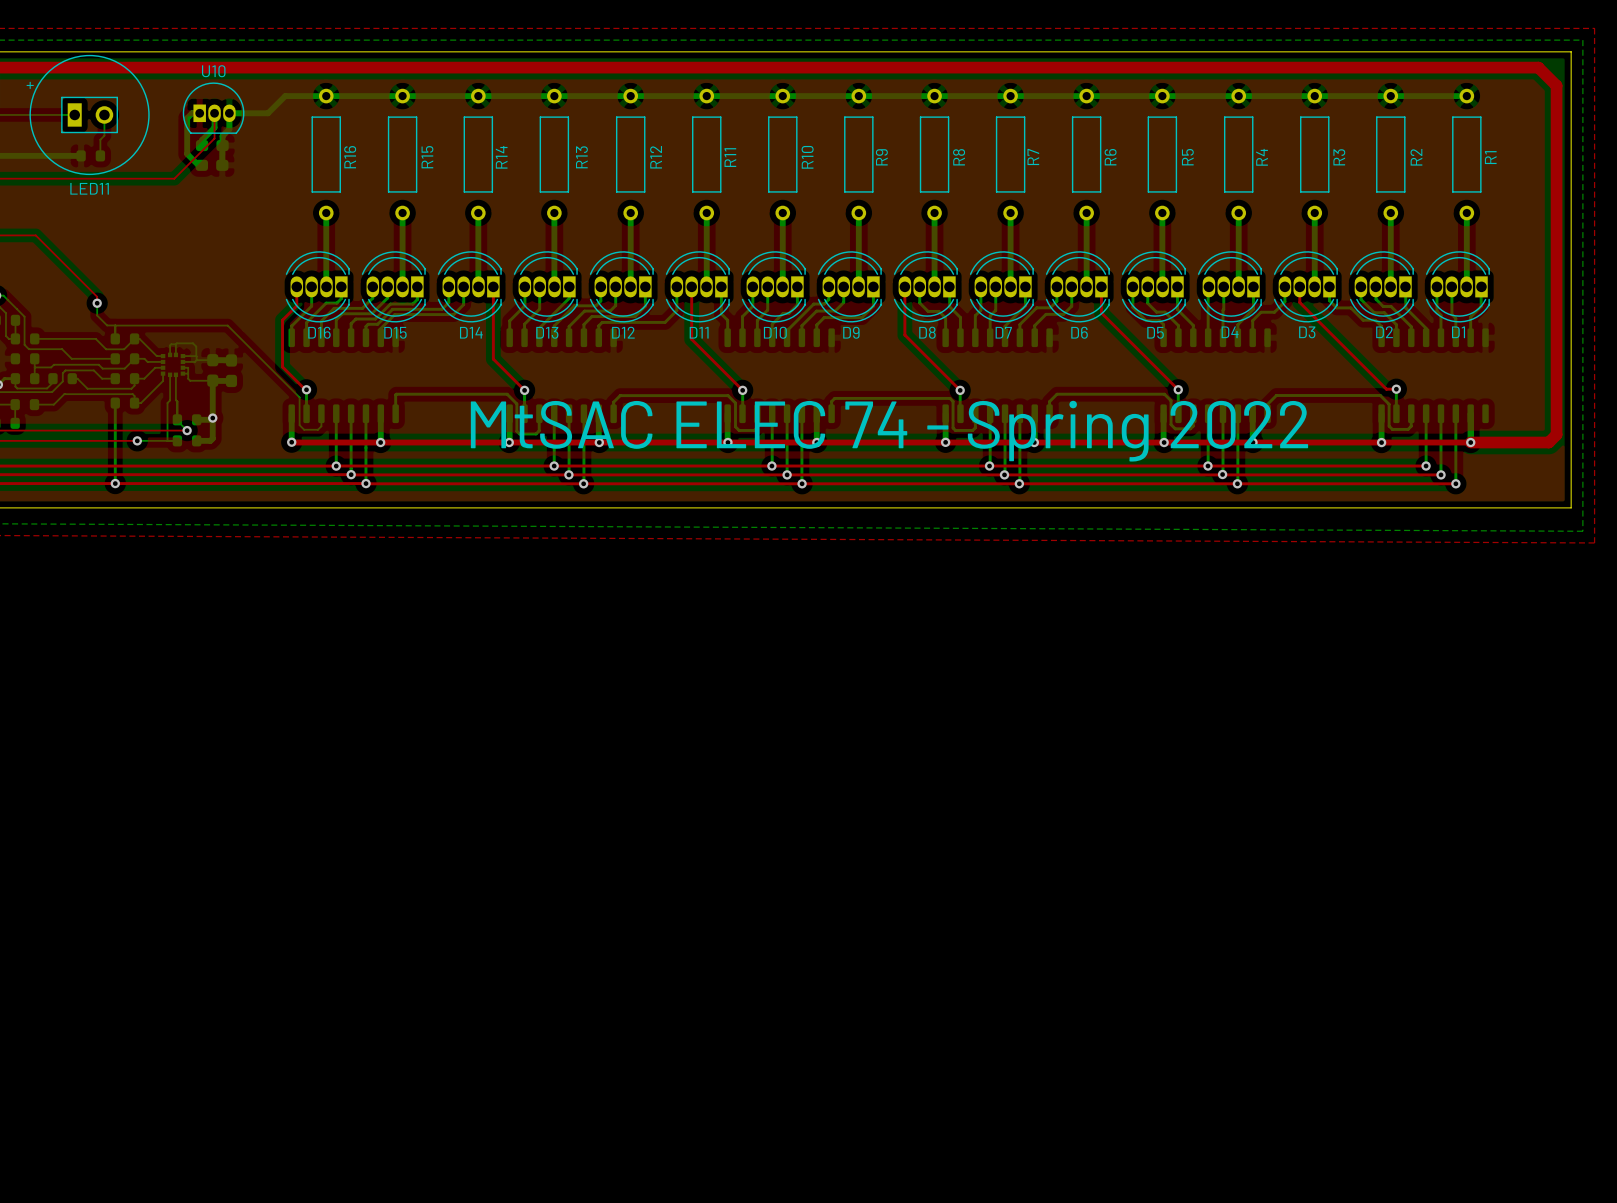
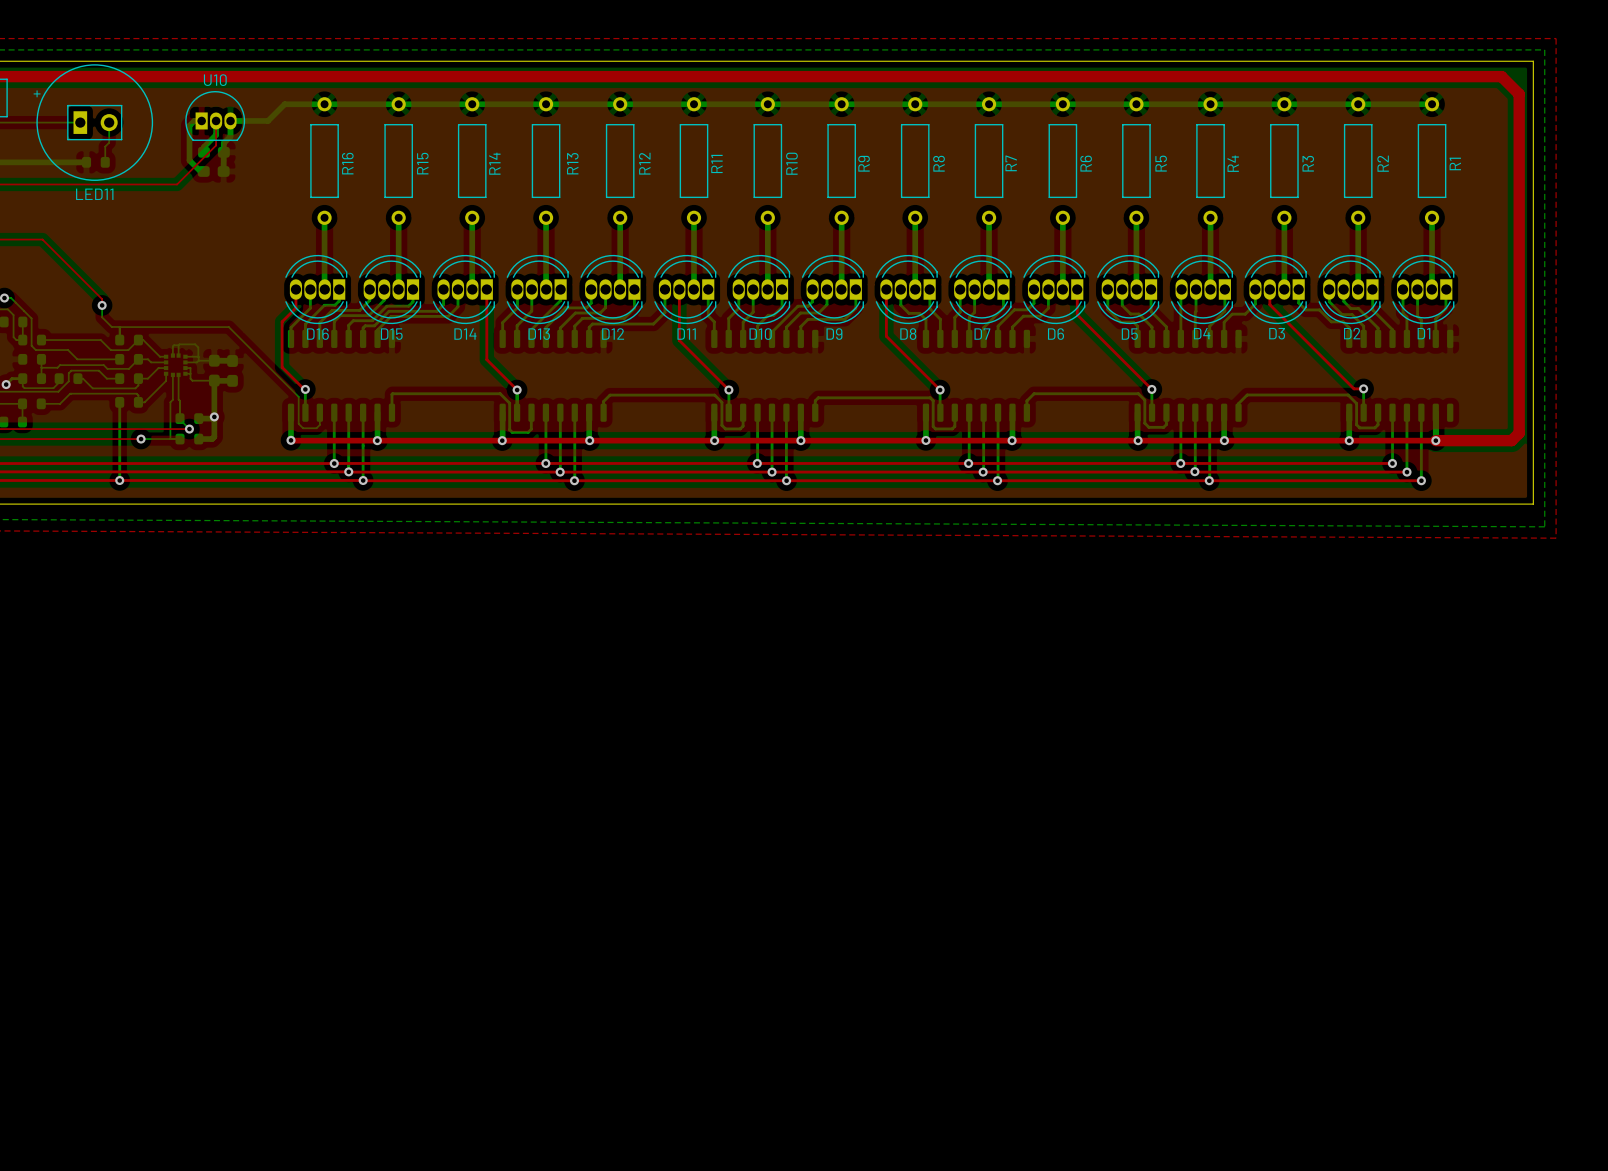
text: MtSAC ELEC 74 - Spring 2022 (889, 431) -> none

